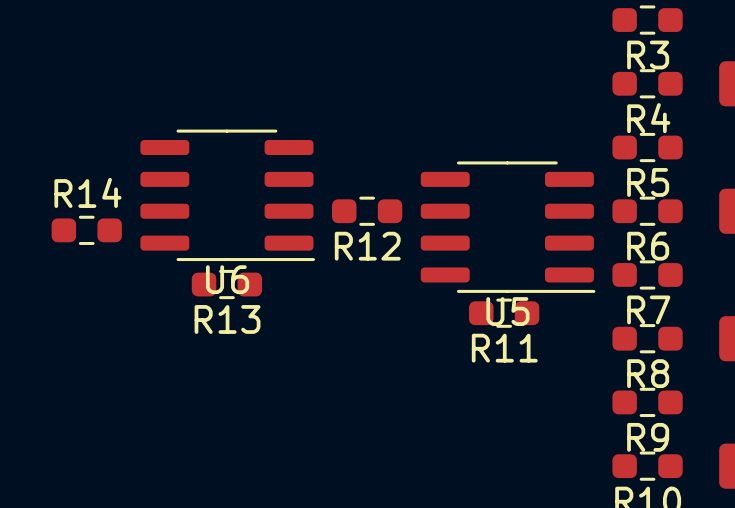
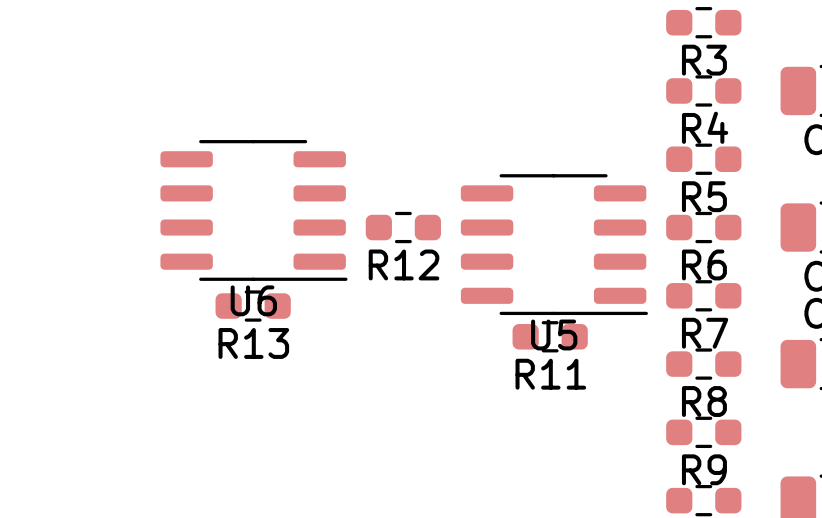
R14: (86, 230) -> none

